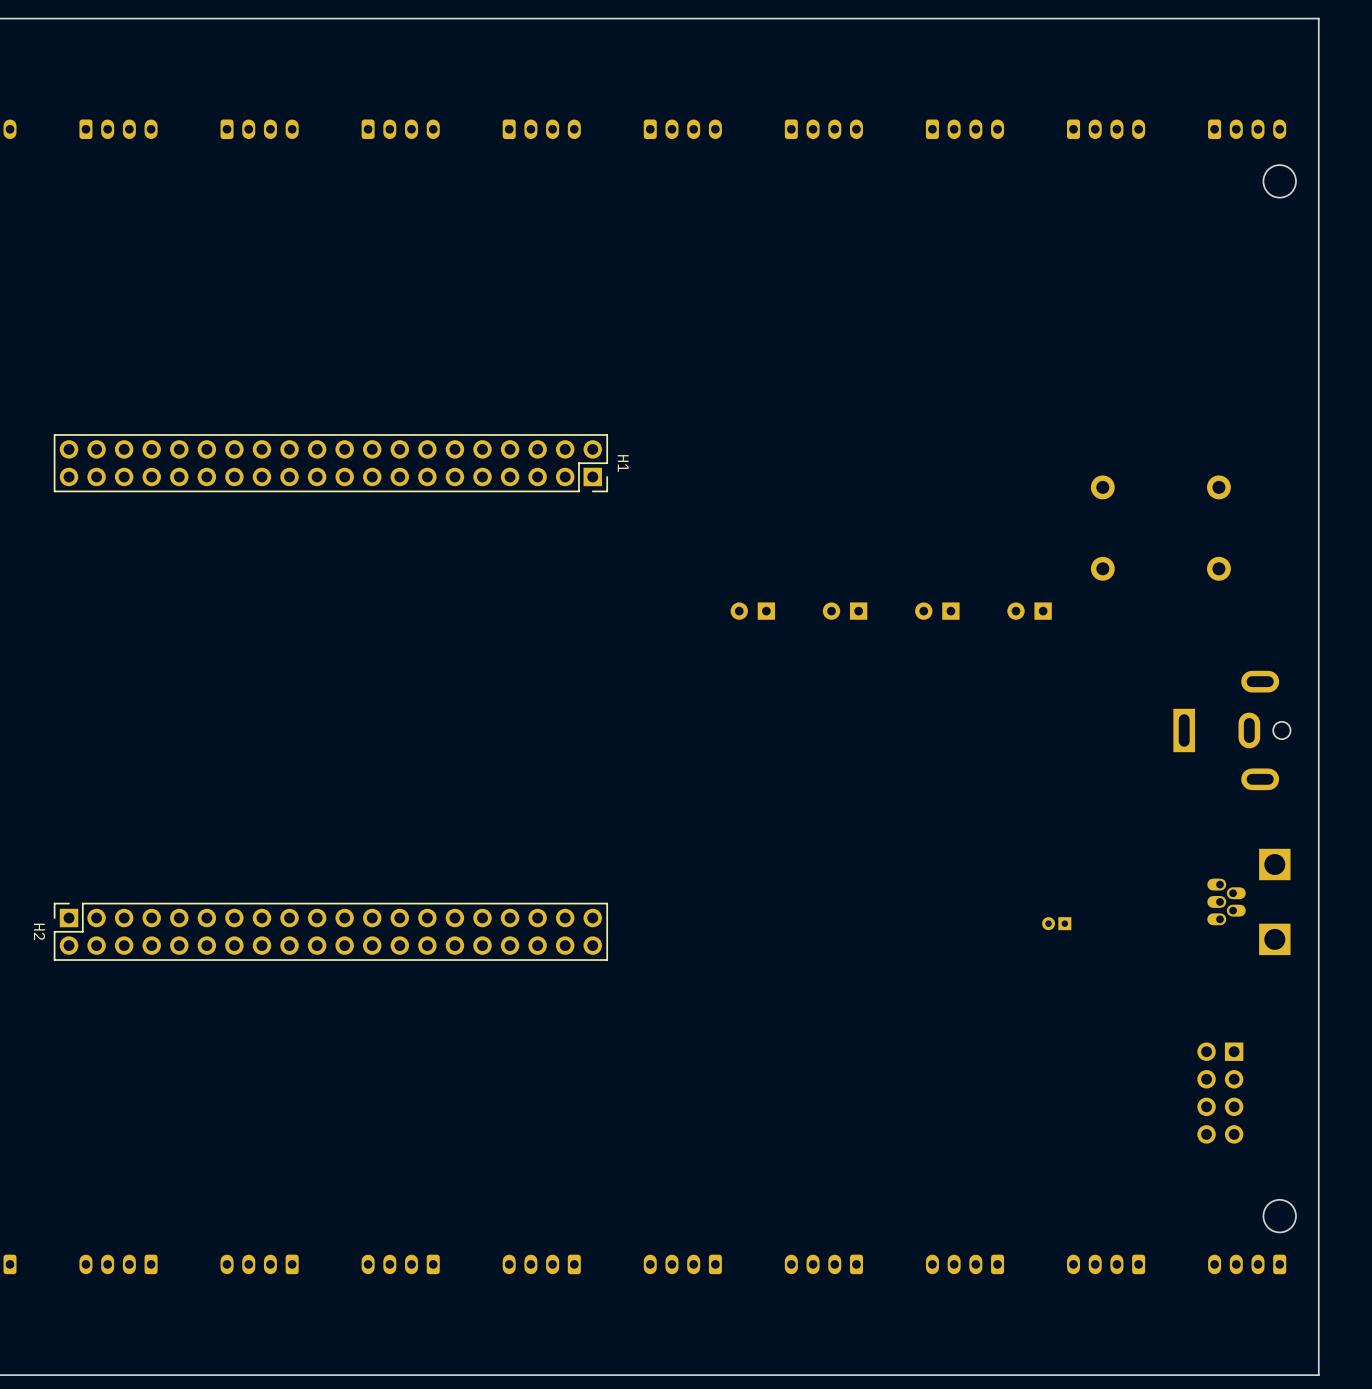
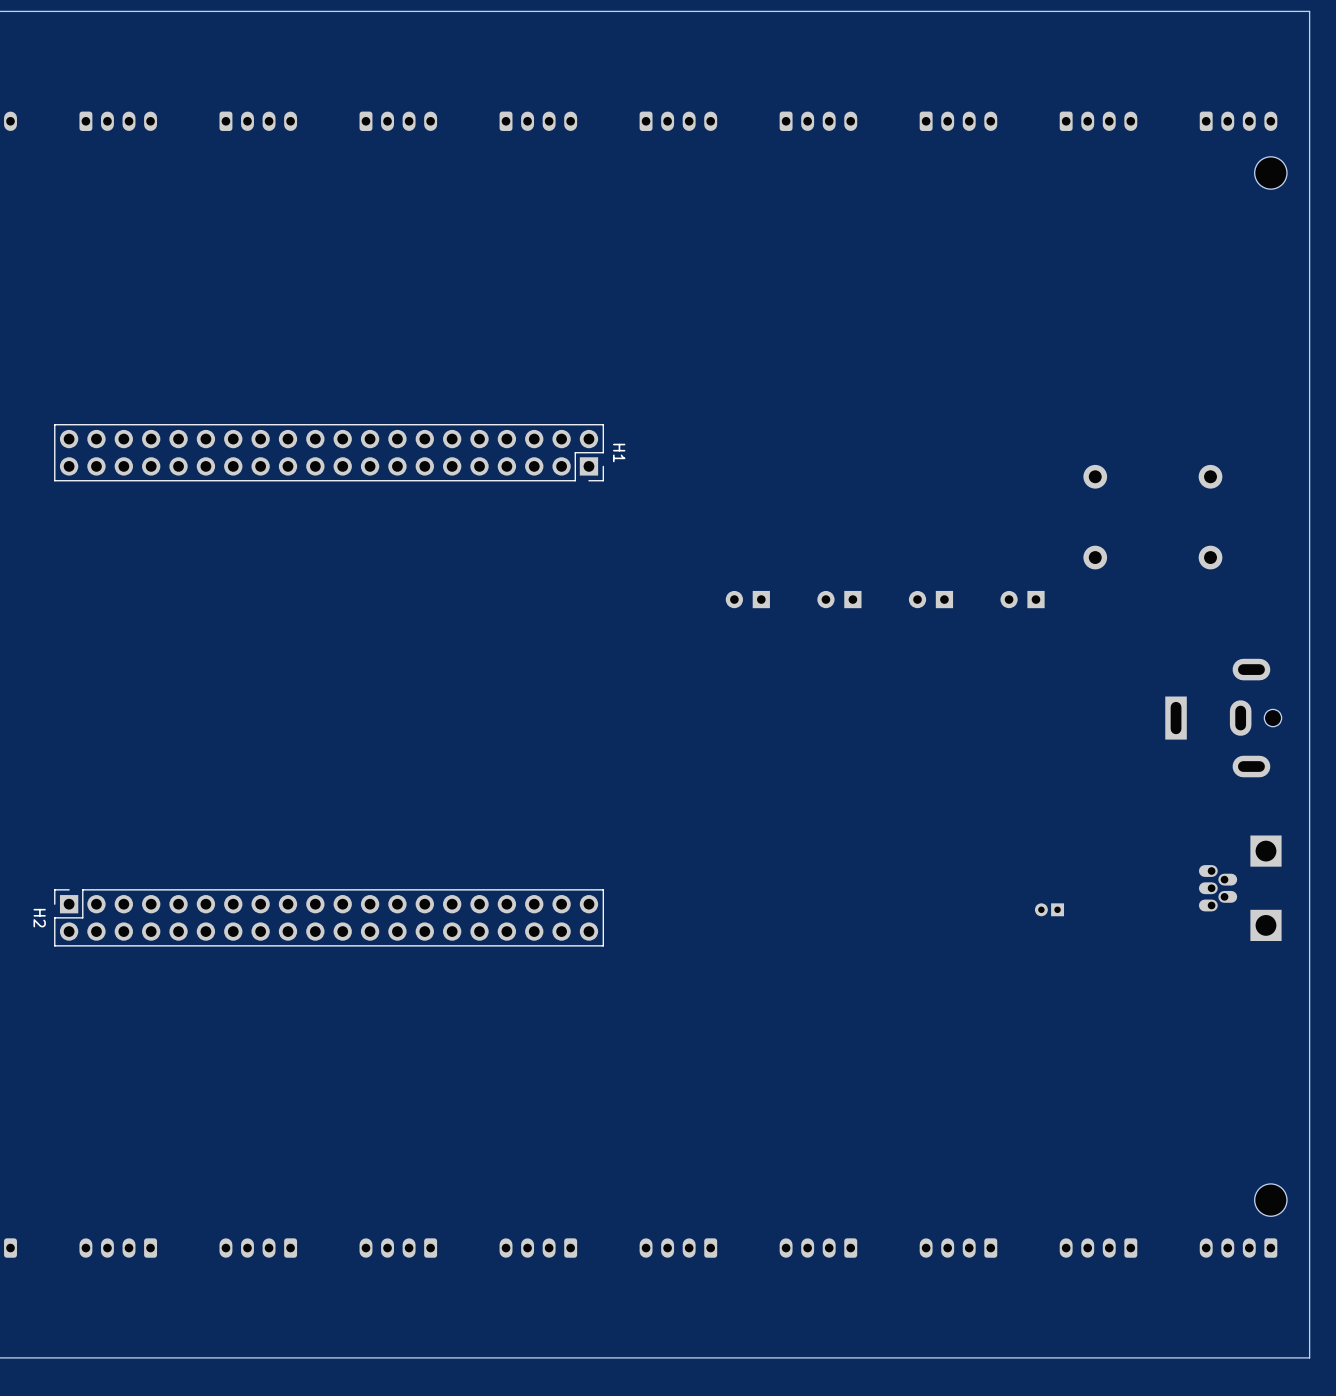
part: (1220, 1093) -> none

